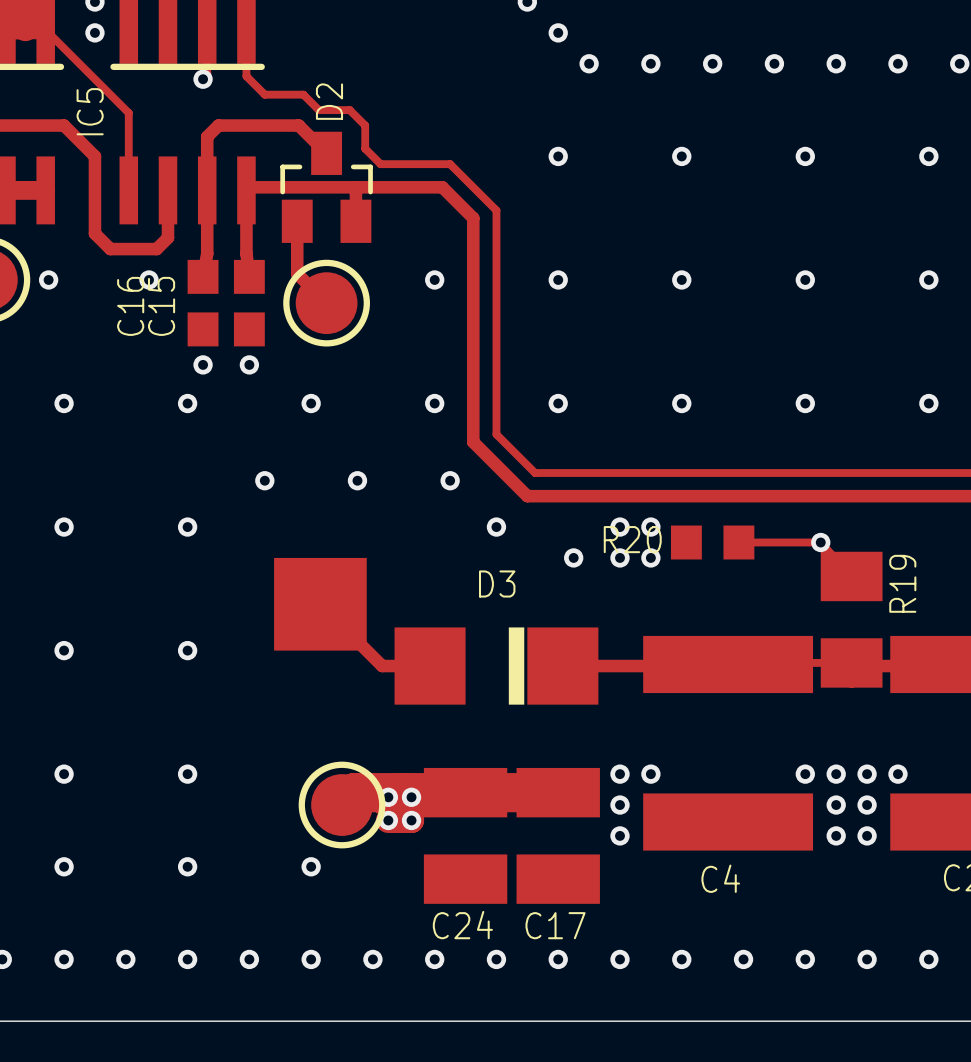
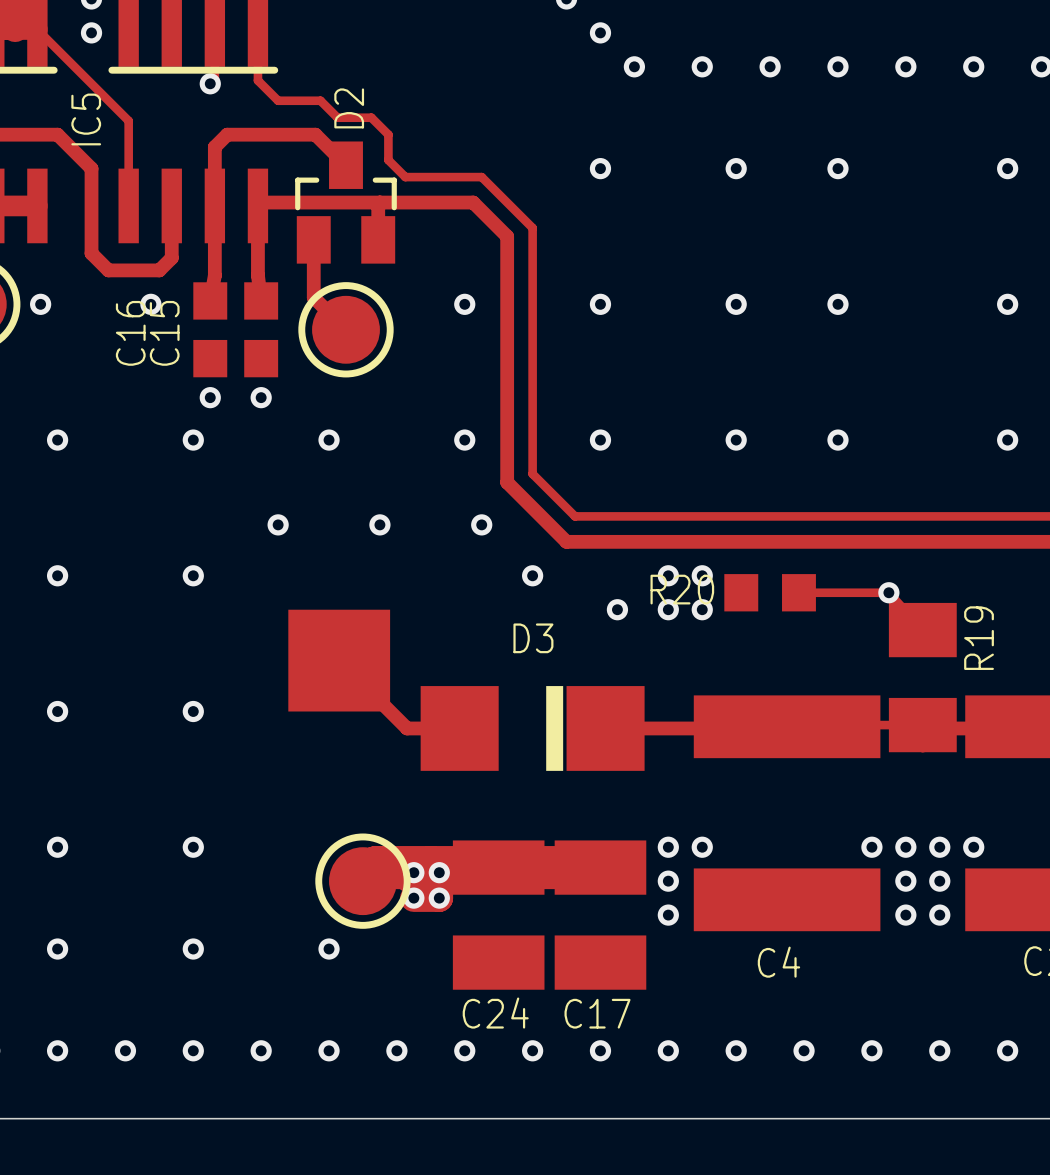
via position: (805, 156) -> (837, 168)
via position: (805, 279) -> (837, 304)
via position: (805, 403) -> (837, 440)

